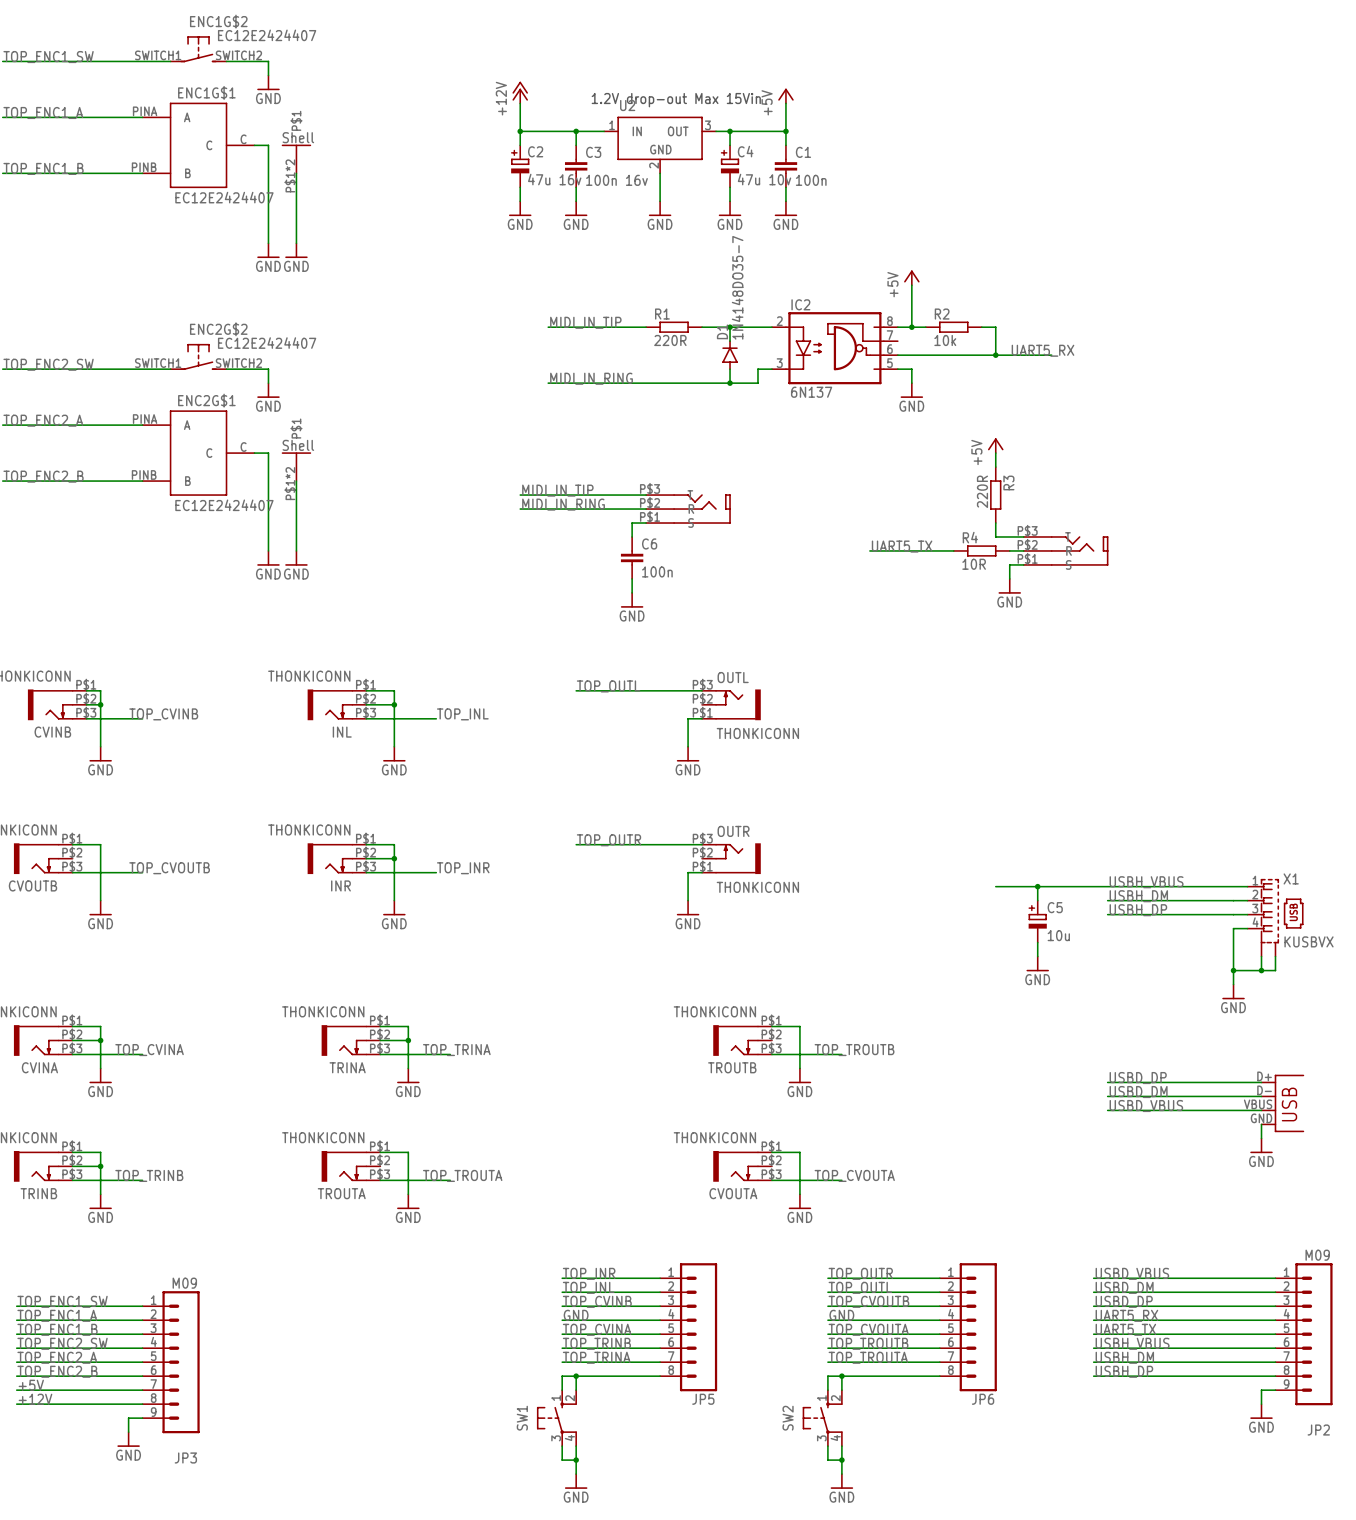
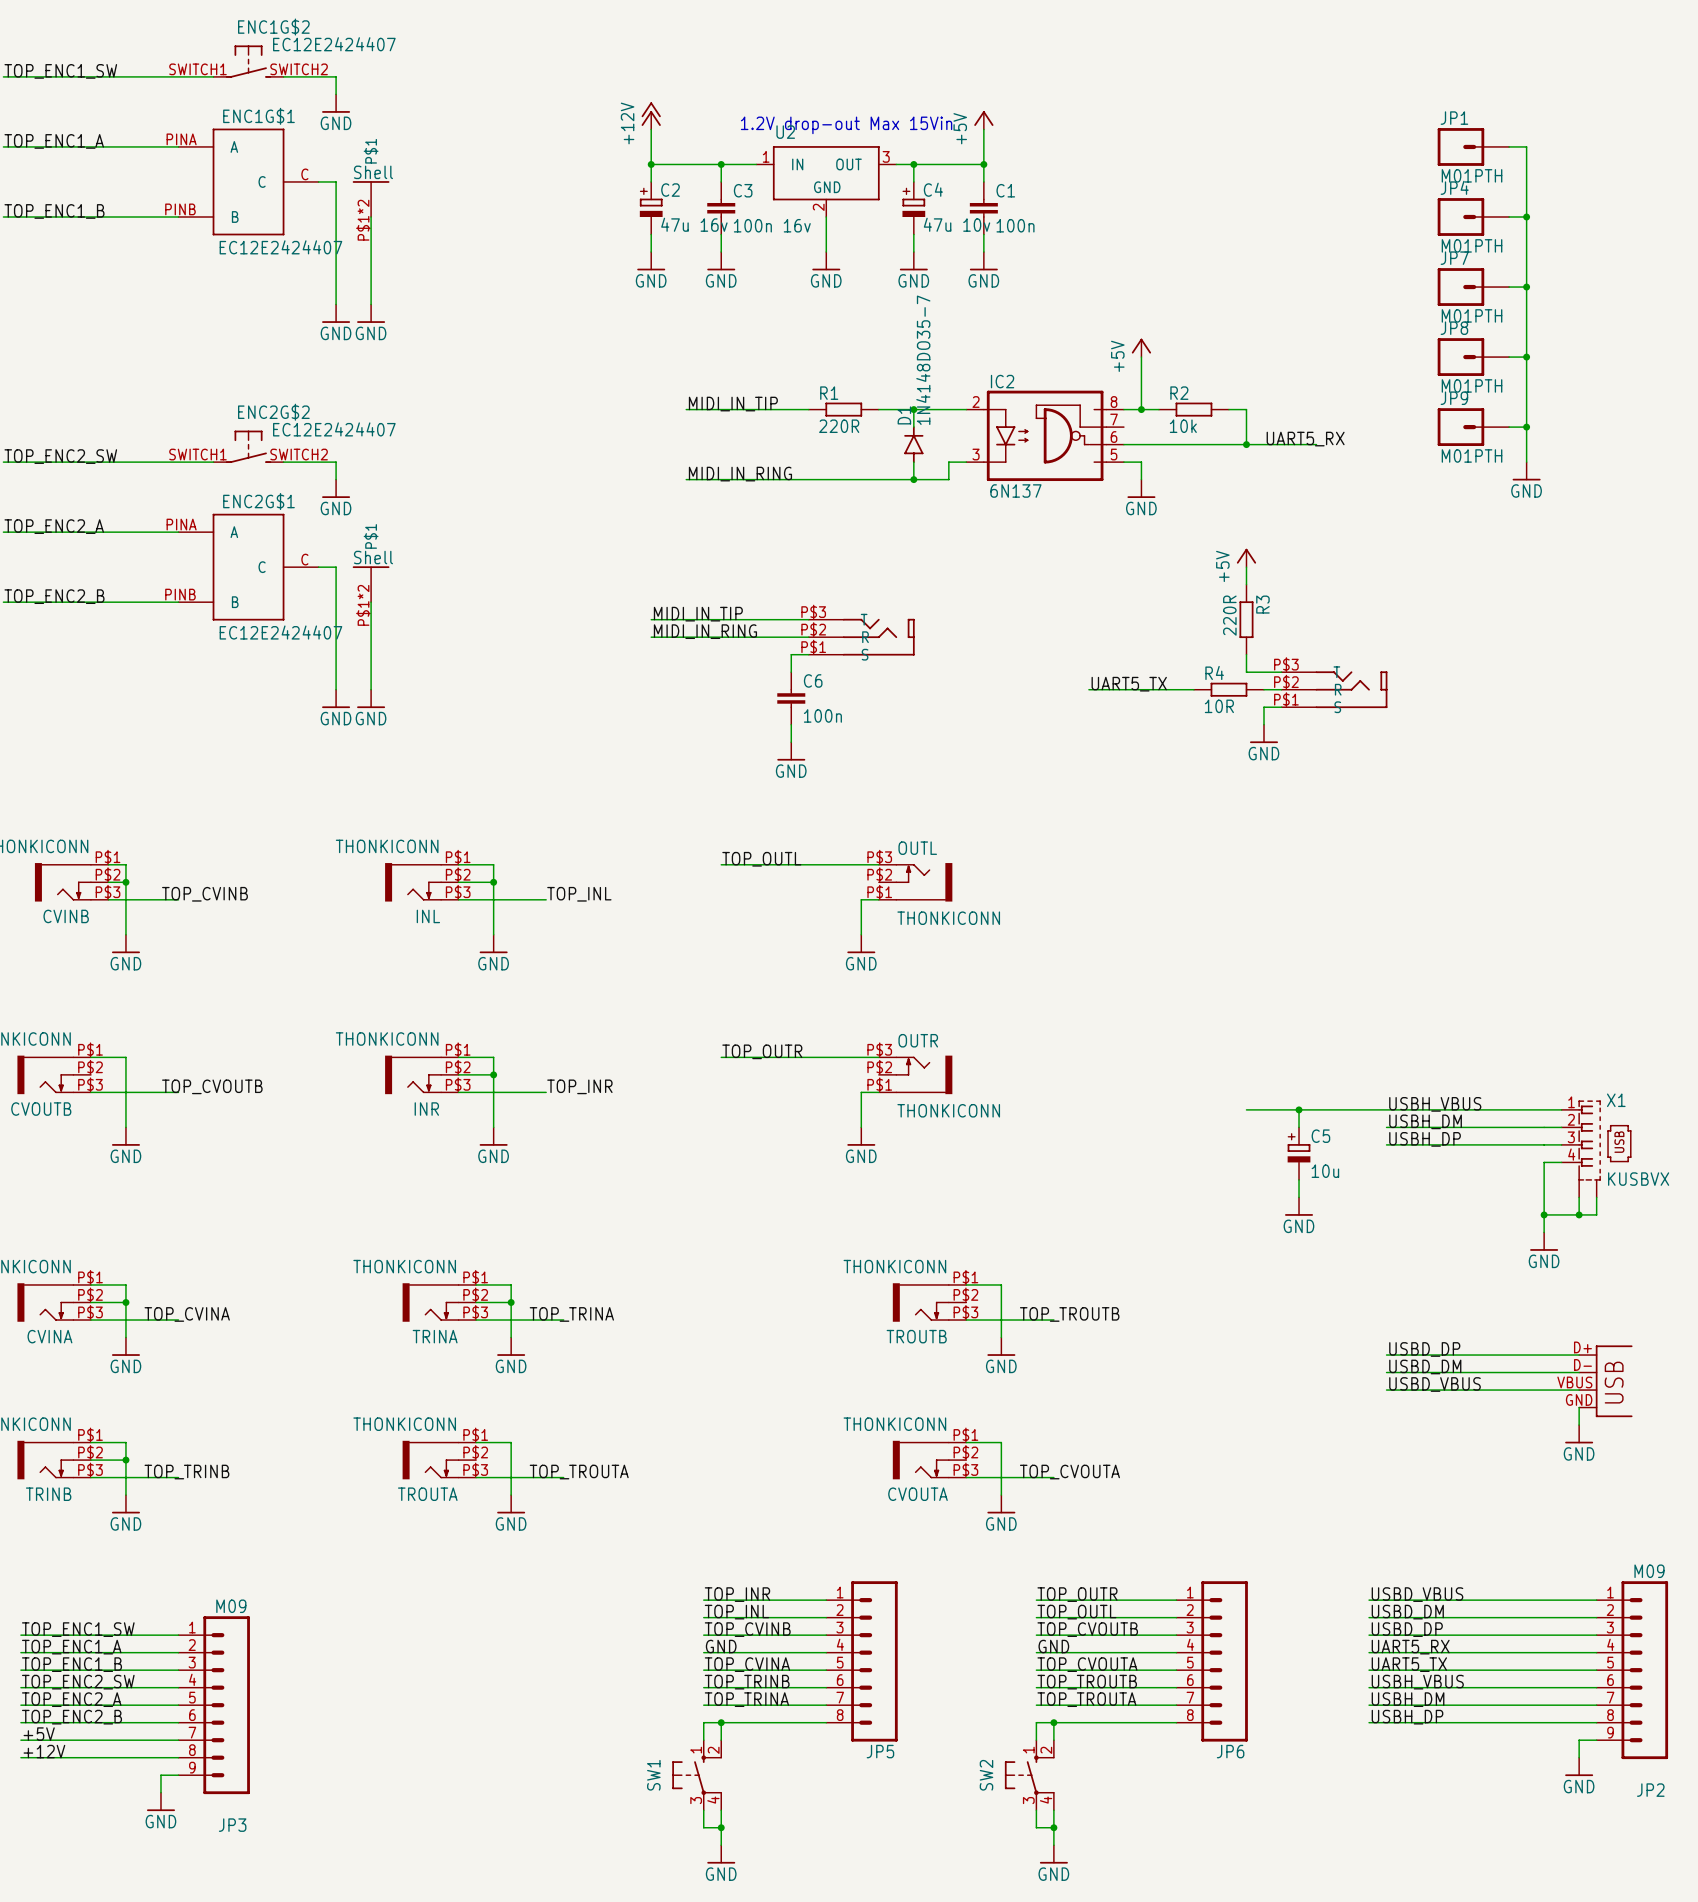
JP1: none -> M01PTH (1473, 146)
wire: none -> (1509, 146) (1526, 146) (1526, 462)
JP4: none -> M01PTH (1473, 217)
wire: none -> (1509, 217) (1526, 217)
junction: none -> (1526, 217)
JP7: none -> M01PTH (1473, 287)
wire: none -> (1509, 287) (1526, 287)
junction: none -> (1526, 287)
JP8: none -> M01PTH (1473, 357)
wire: none -> (1509, 357) (1526, 357)
junction: none -> (1526, 357)
JP9: none -> M01PTH (1473, 427)
wire: none -> (1509, 427) (1526, 427)
junction: none -> (1526, 427)
power symbol: none -> GND (1526, 471)

